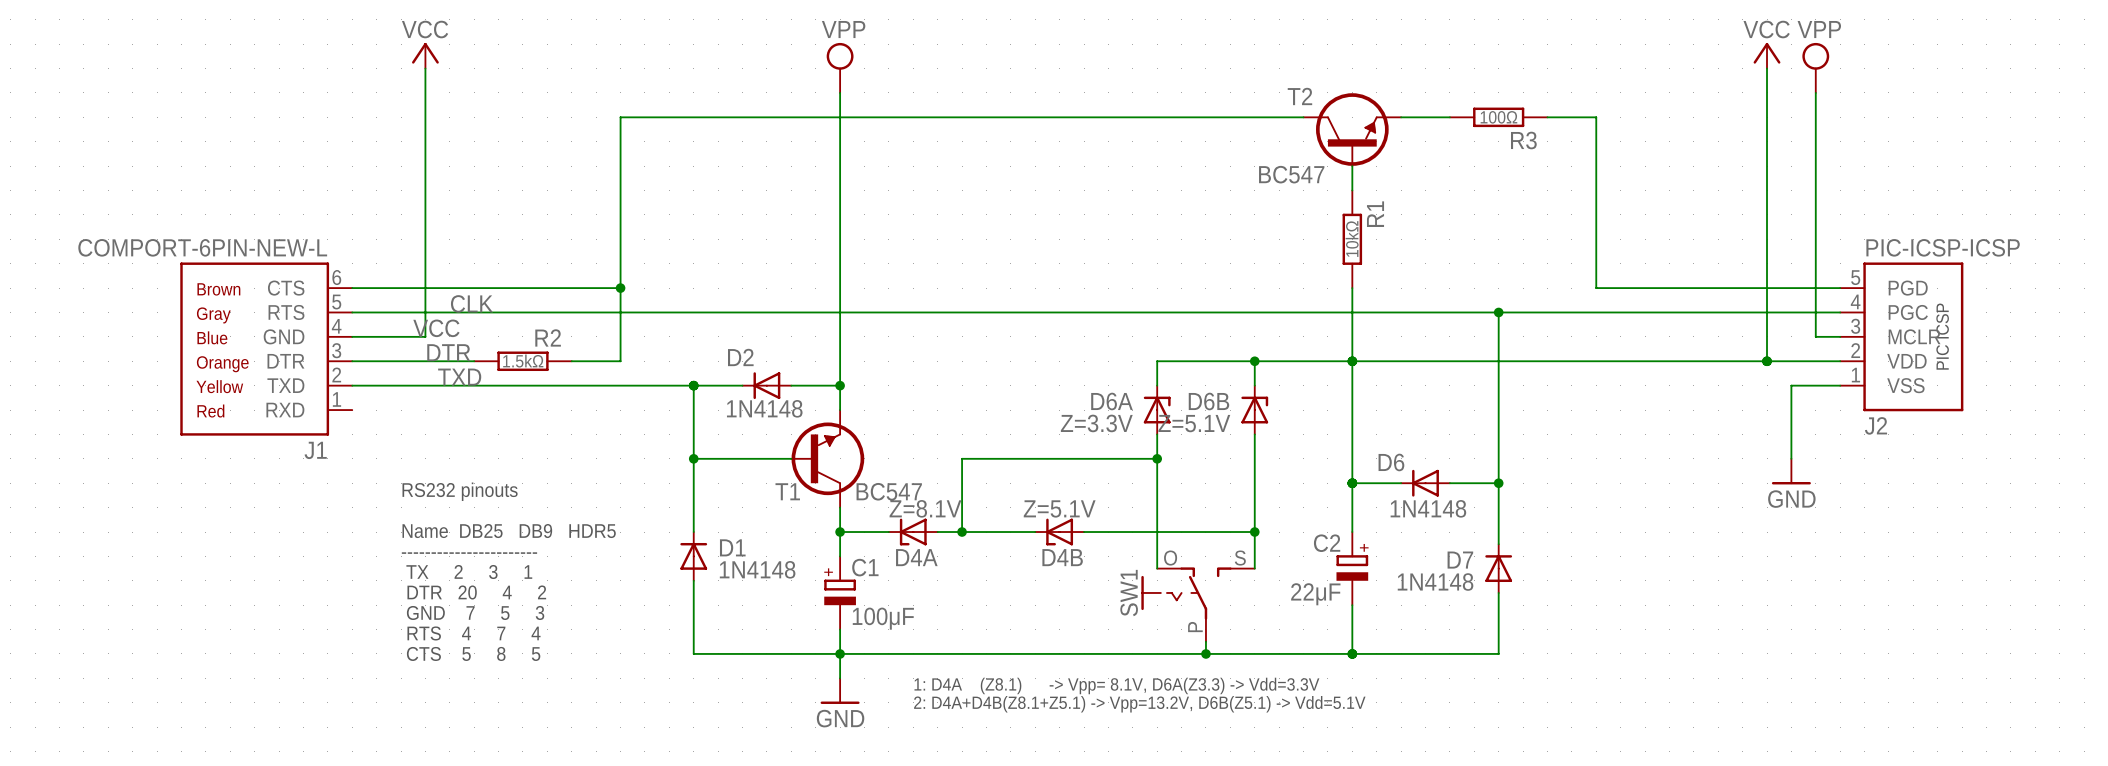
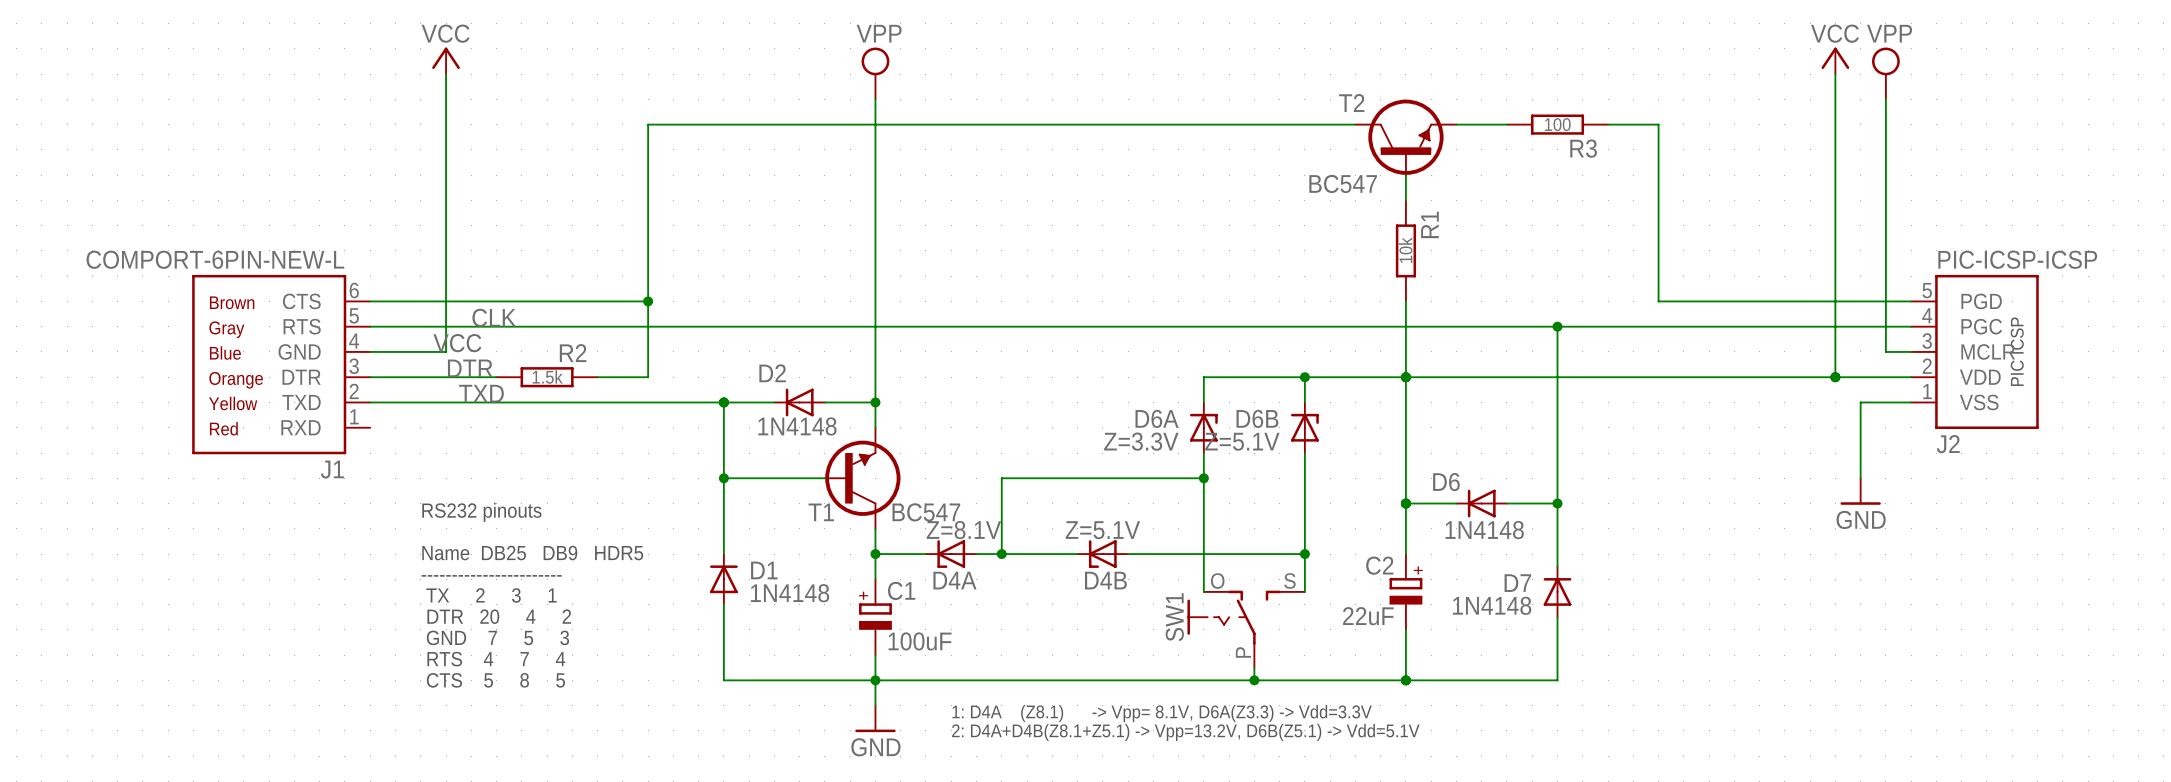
R3 value: 100Ω (1498, 117) -> 100 (1557, 124)
R1 value: 10kΩ (1352, 239) -> 10k (1405, 250)
R2 value: 1.5kΩ (523, 361) -> 1.5k (547, 376)
C2 value: 22μF (1315, 594) -> 22uF (1368, 616)
C1 value: 100μF (883, 618) -> 100uF (920, 641)

